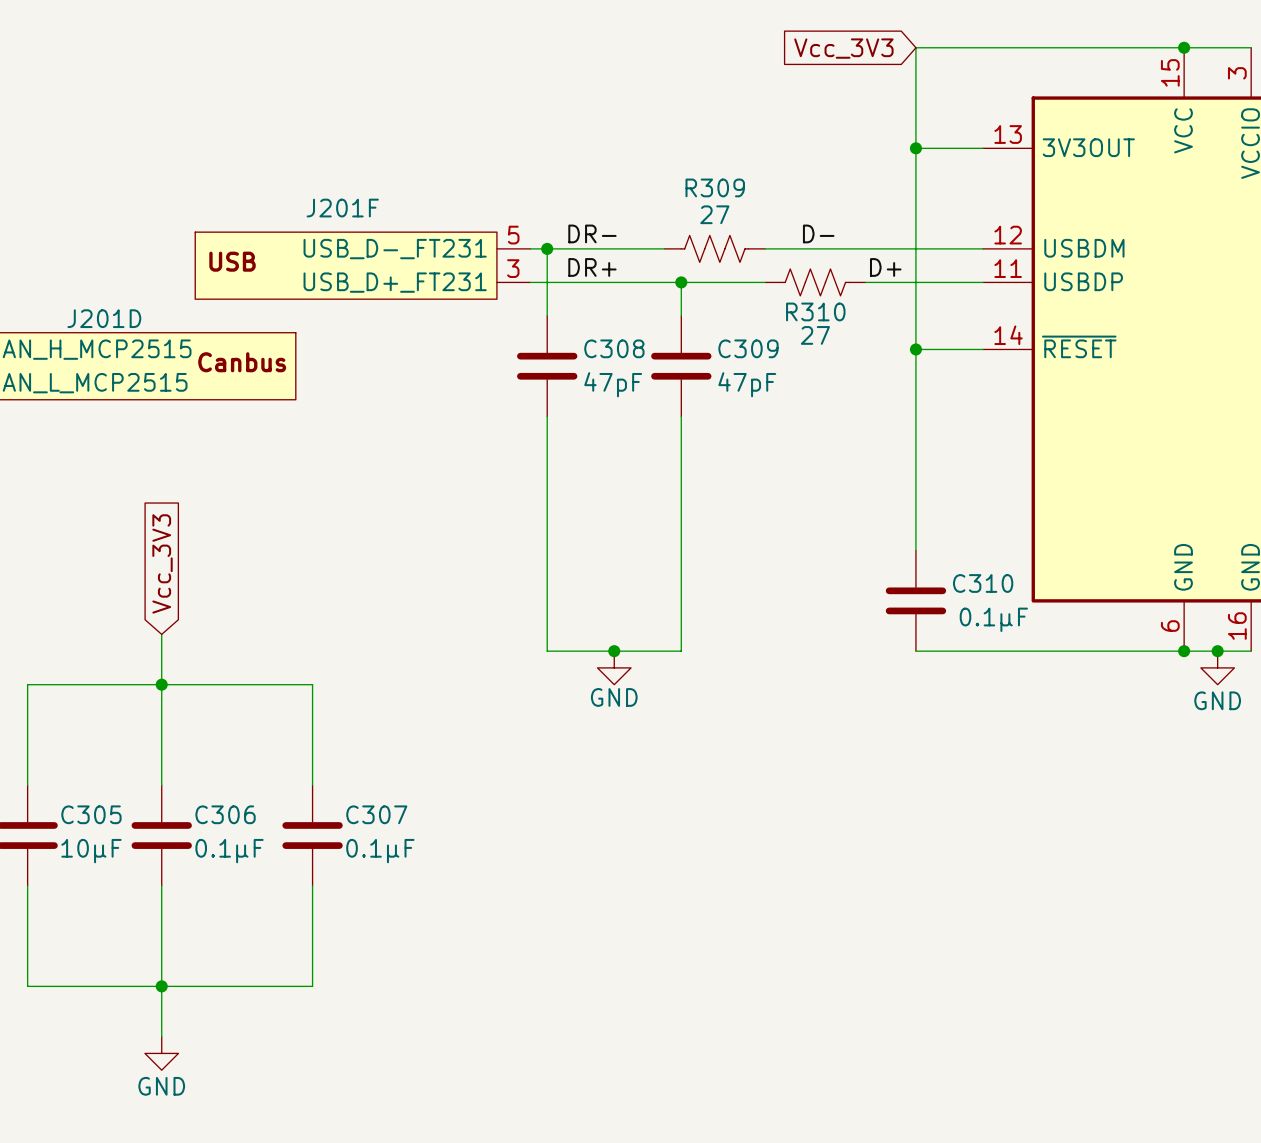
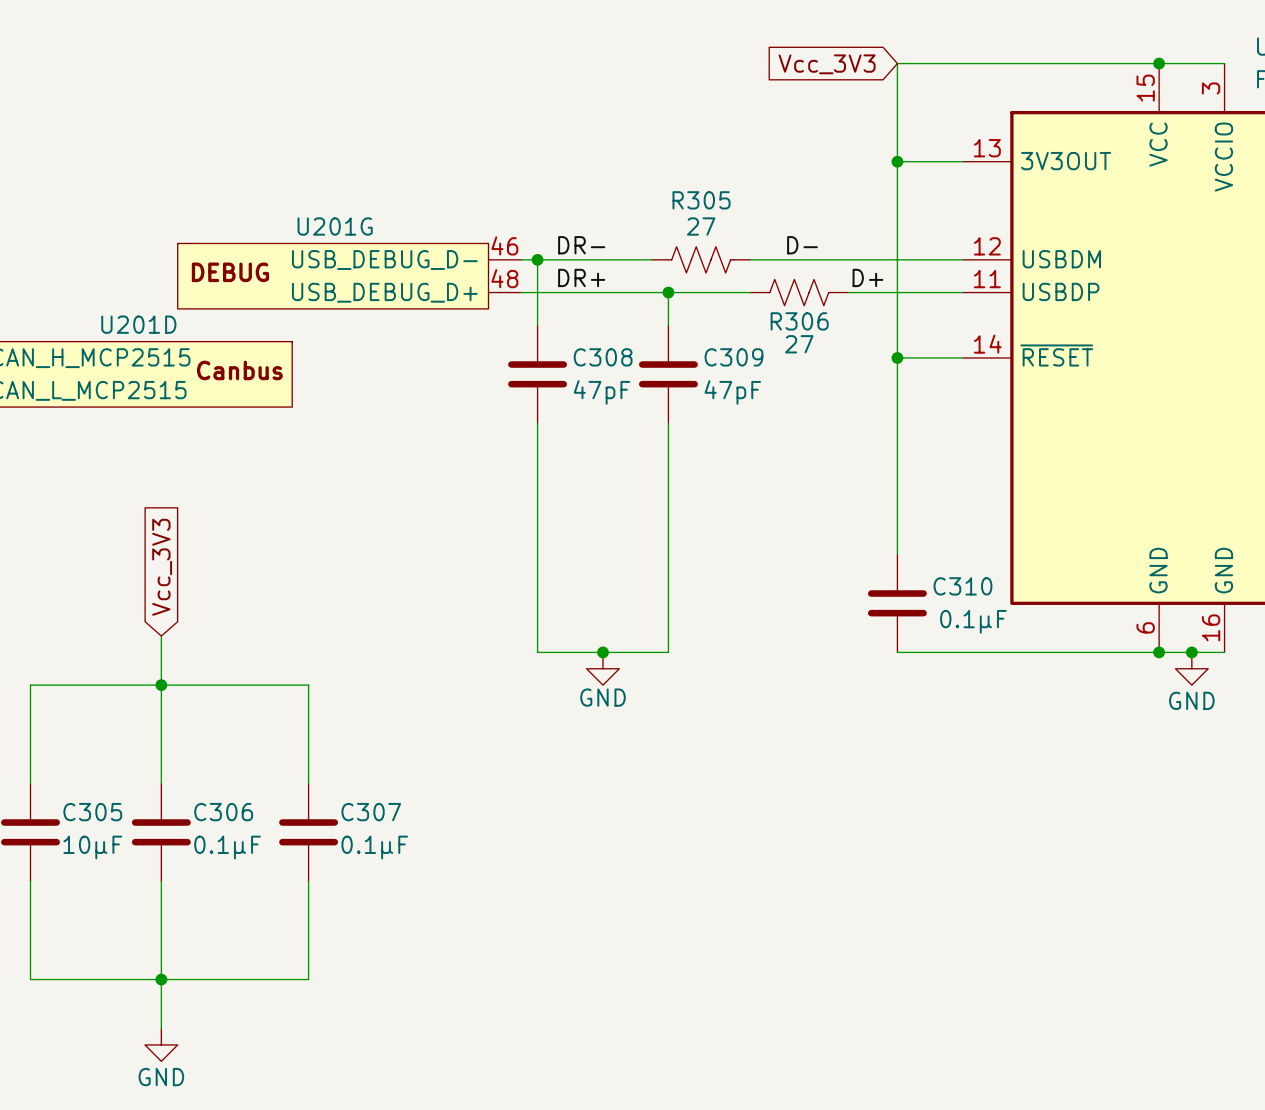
R309 name: R309 (715, 187) -> R305 (701, 200)
U201G: none -> (349, 276)
J201F: (362, 265) -> none
R310 name: R310 (815, 311) -> R306 (799, 321)
J201D name: J201D (104, 318) -> U201D (138, 324)

